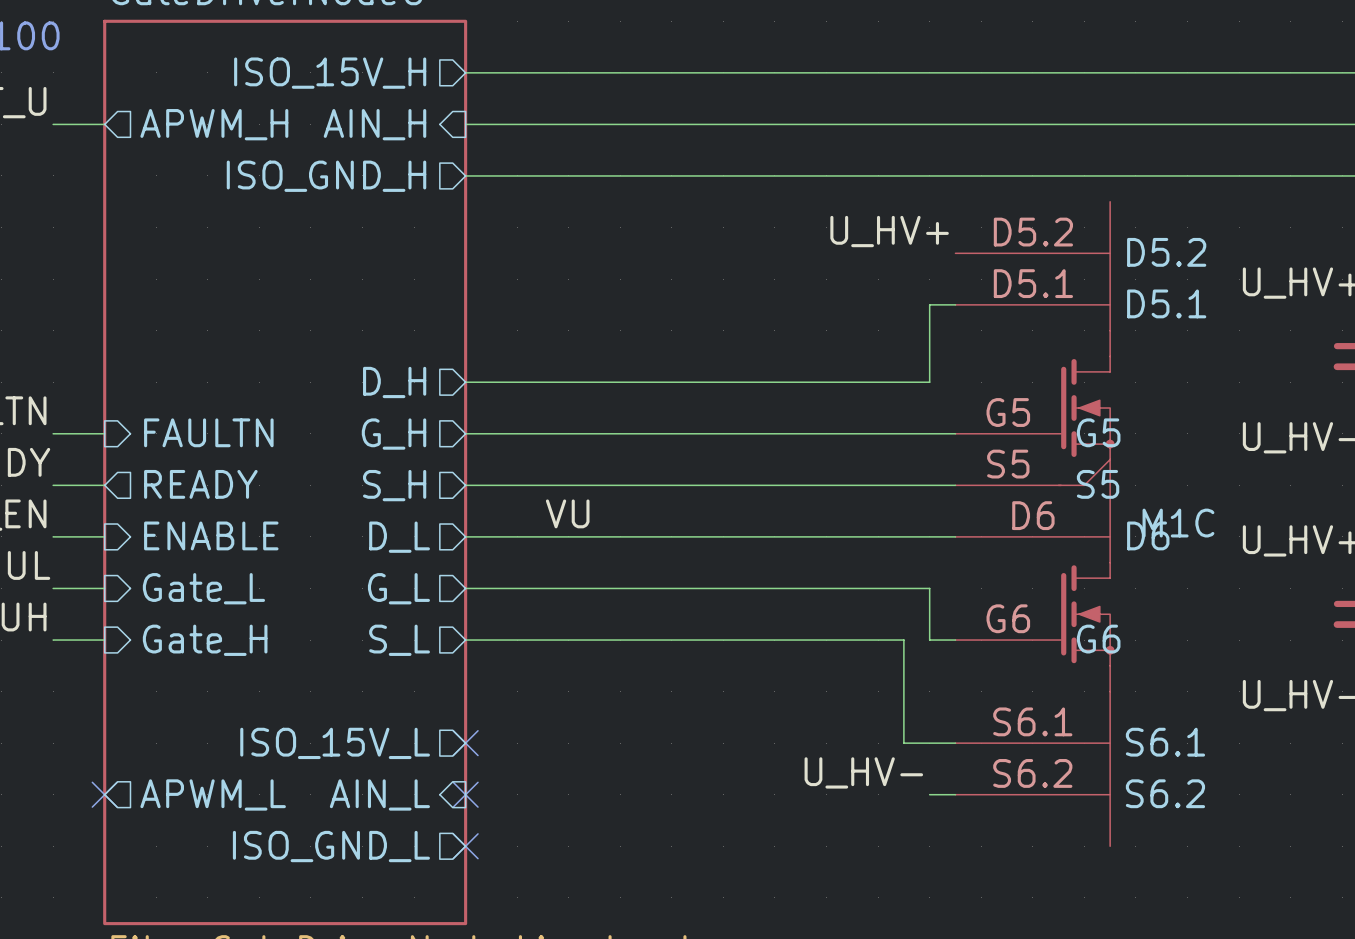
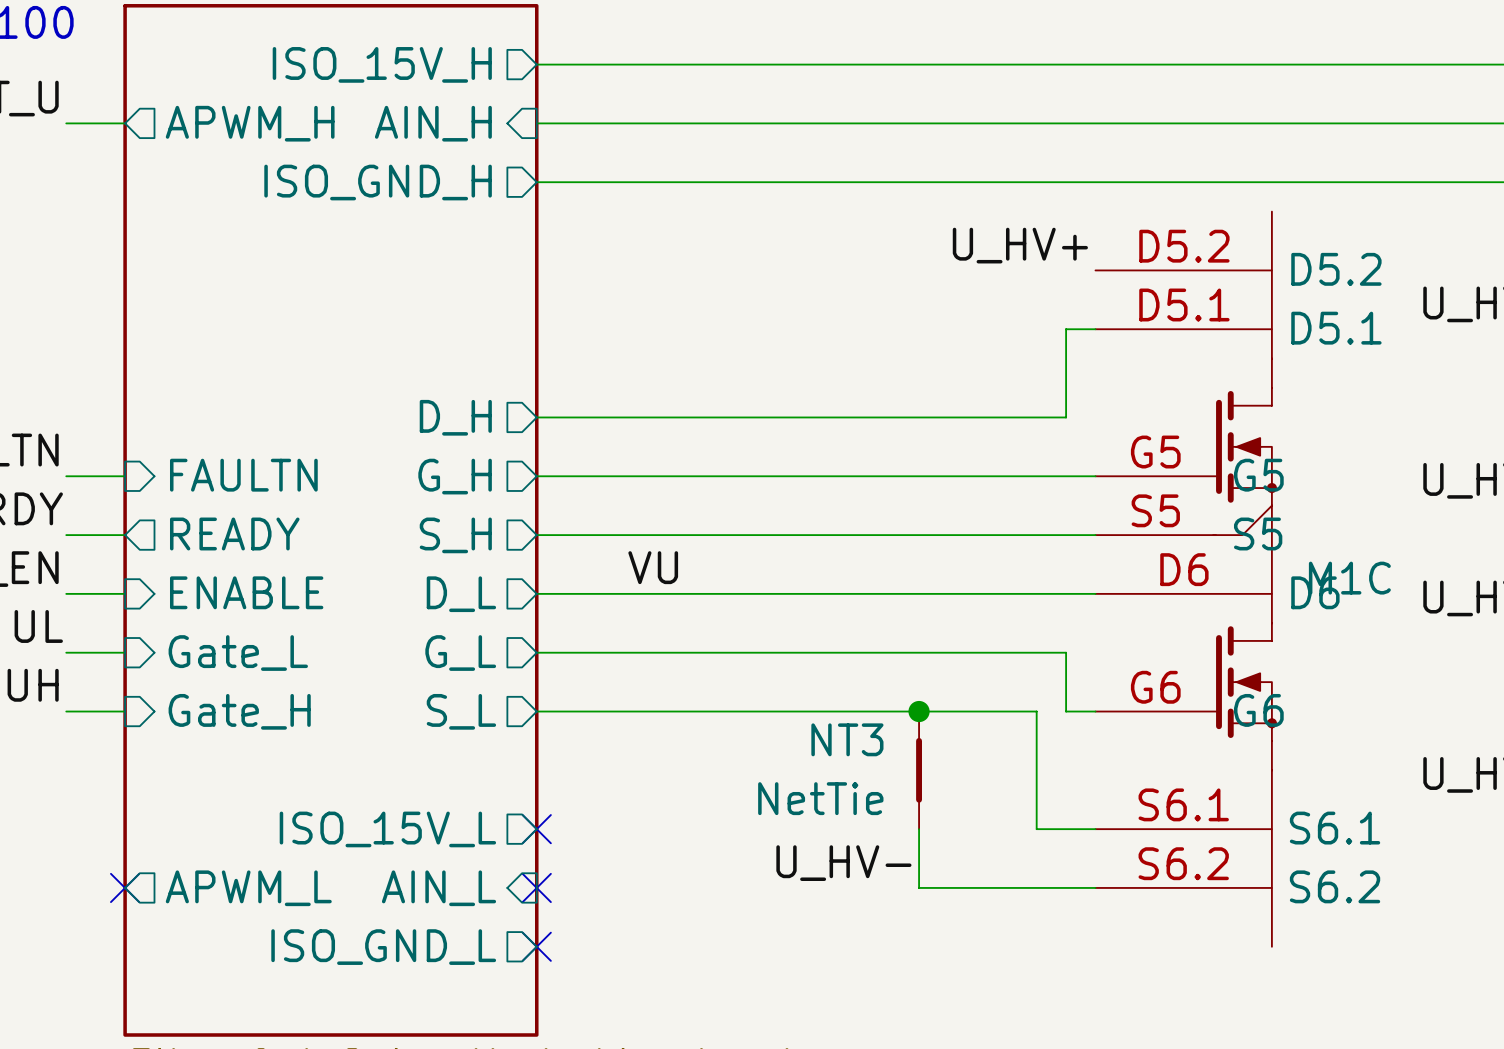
junction: none -> (919, 711)
NT3: none -> NetTie (919, 770)
wire: none -> (919, 829) (919, 887) (1066, 887)
label position: U_HV- (863, 772) -> U_HV- (843, 863)

